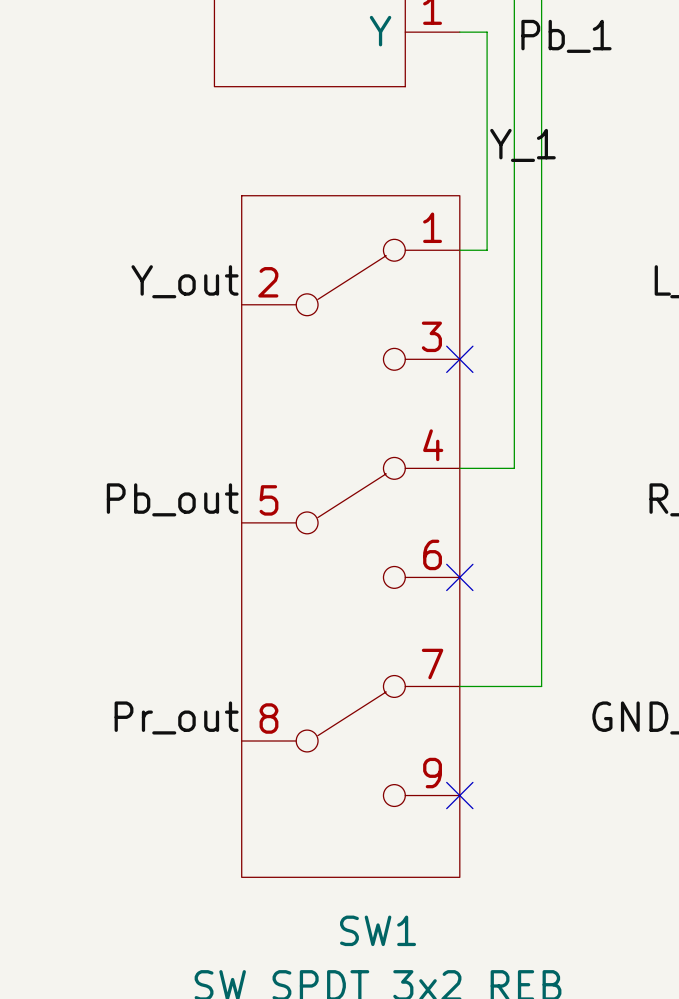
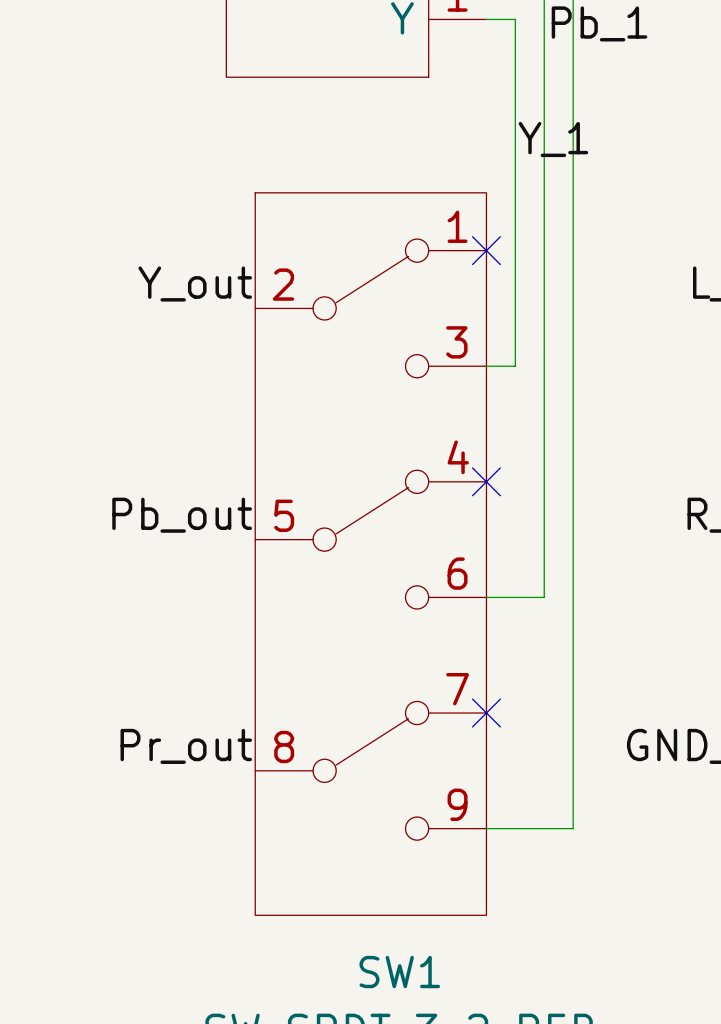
wire: (459, 250) (487, 250) -> (486, 366) (515, 366) (515, 250)
no-connect mark: none -> (486, 250)
no-connect mark: (459, 359) -> none
wire: (459, 468) (514, 468) -> (486, 597) (544, 597) (544, 481)
no-connect mark: none -> (486, 481)
no-connect mark: (459, 577) -> none
wire: (459, 686) (541, 686) -> (486, 828) (573, 828) (573, 713)
no-connect mark: none -> (486, 713)
no-connect mark: (459, 795) -> none

